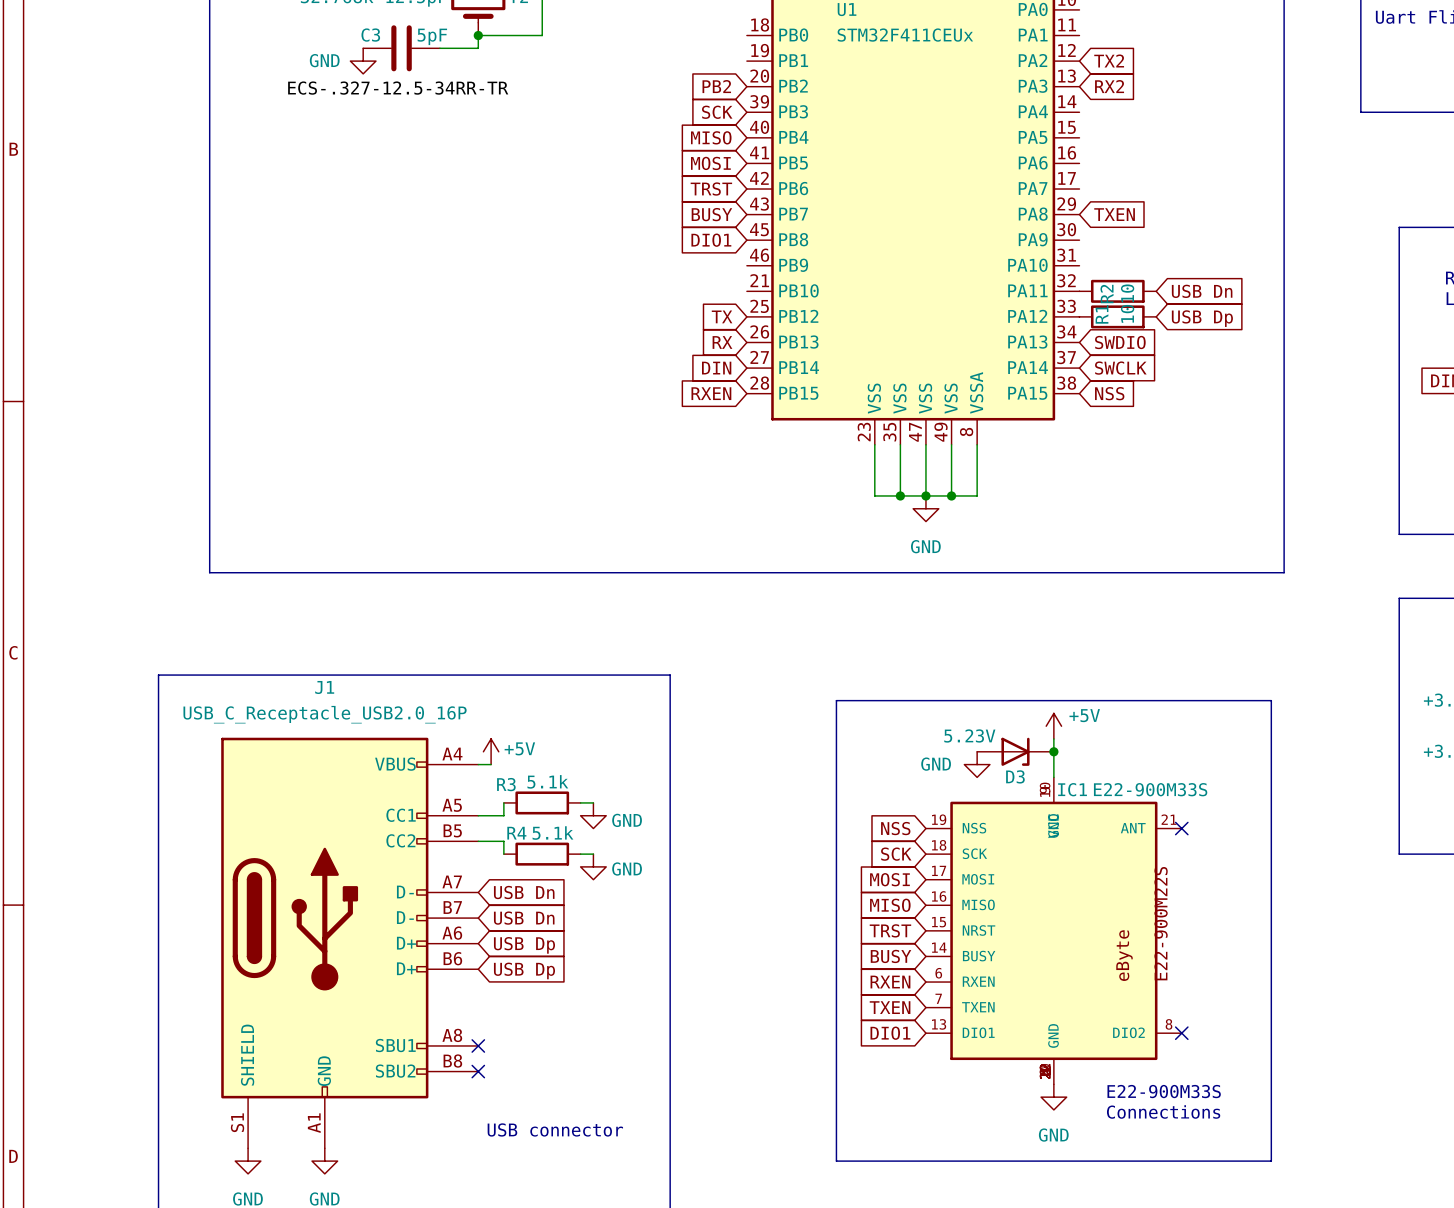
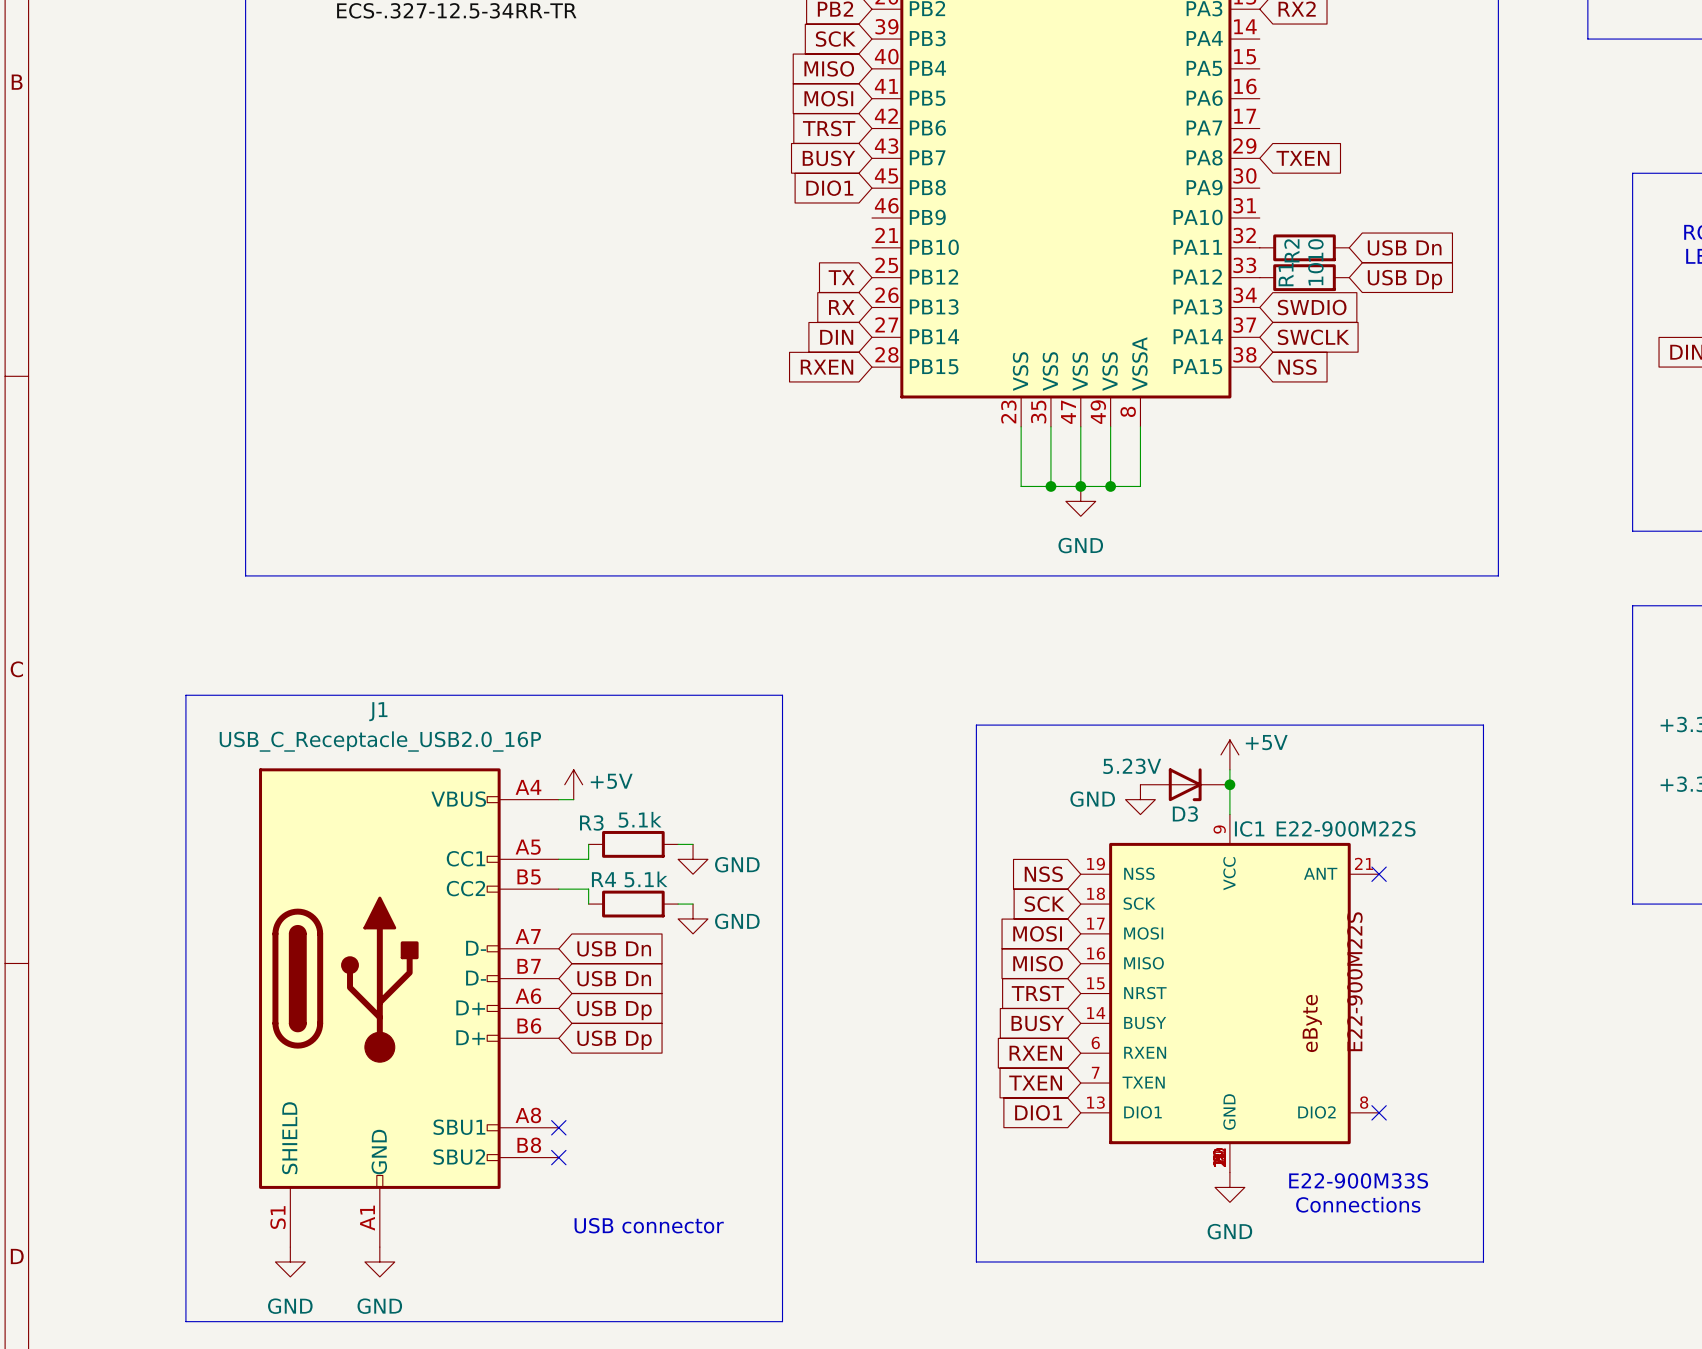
IC1 symbol: [925, 777, 1182, 1085] -> [1080, 814, 1380, 1173]
IC1 value: E22-900M33S (1150, 789) -> E22-900M22S (1346, 828)

